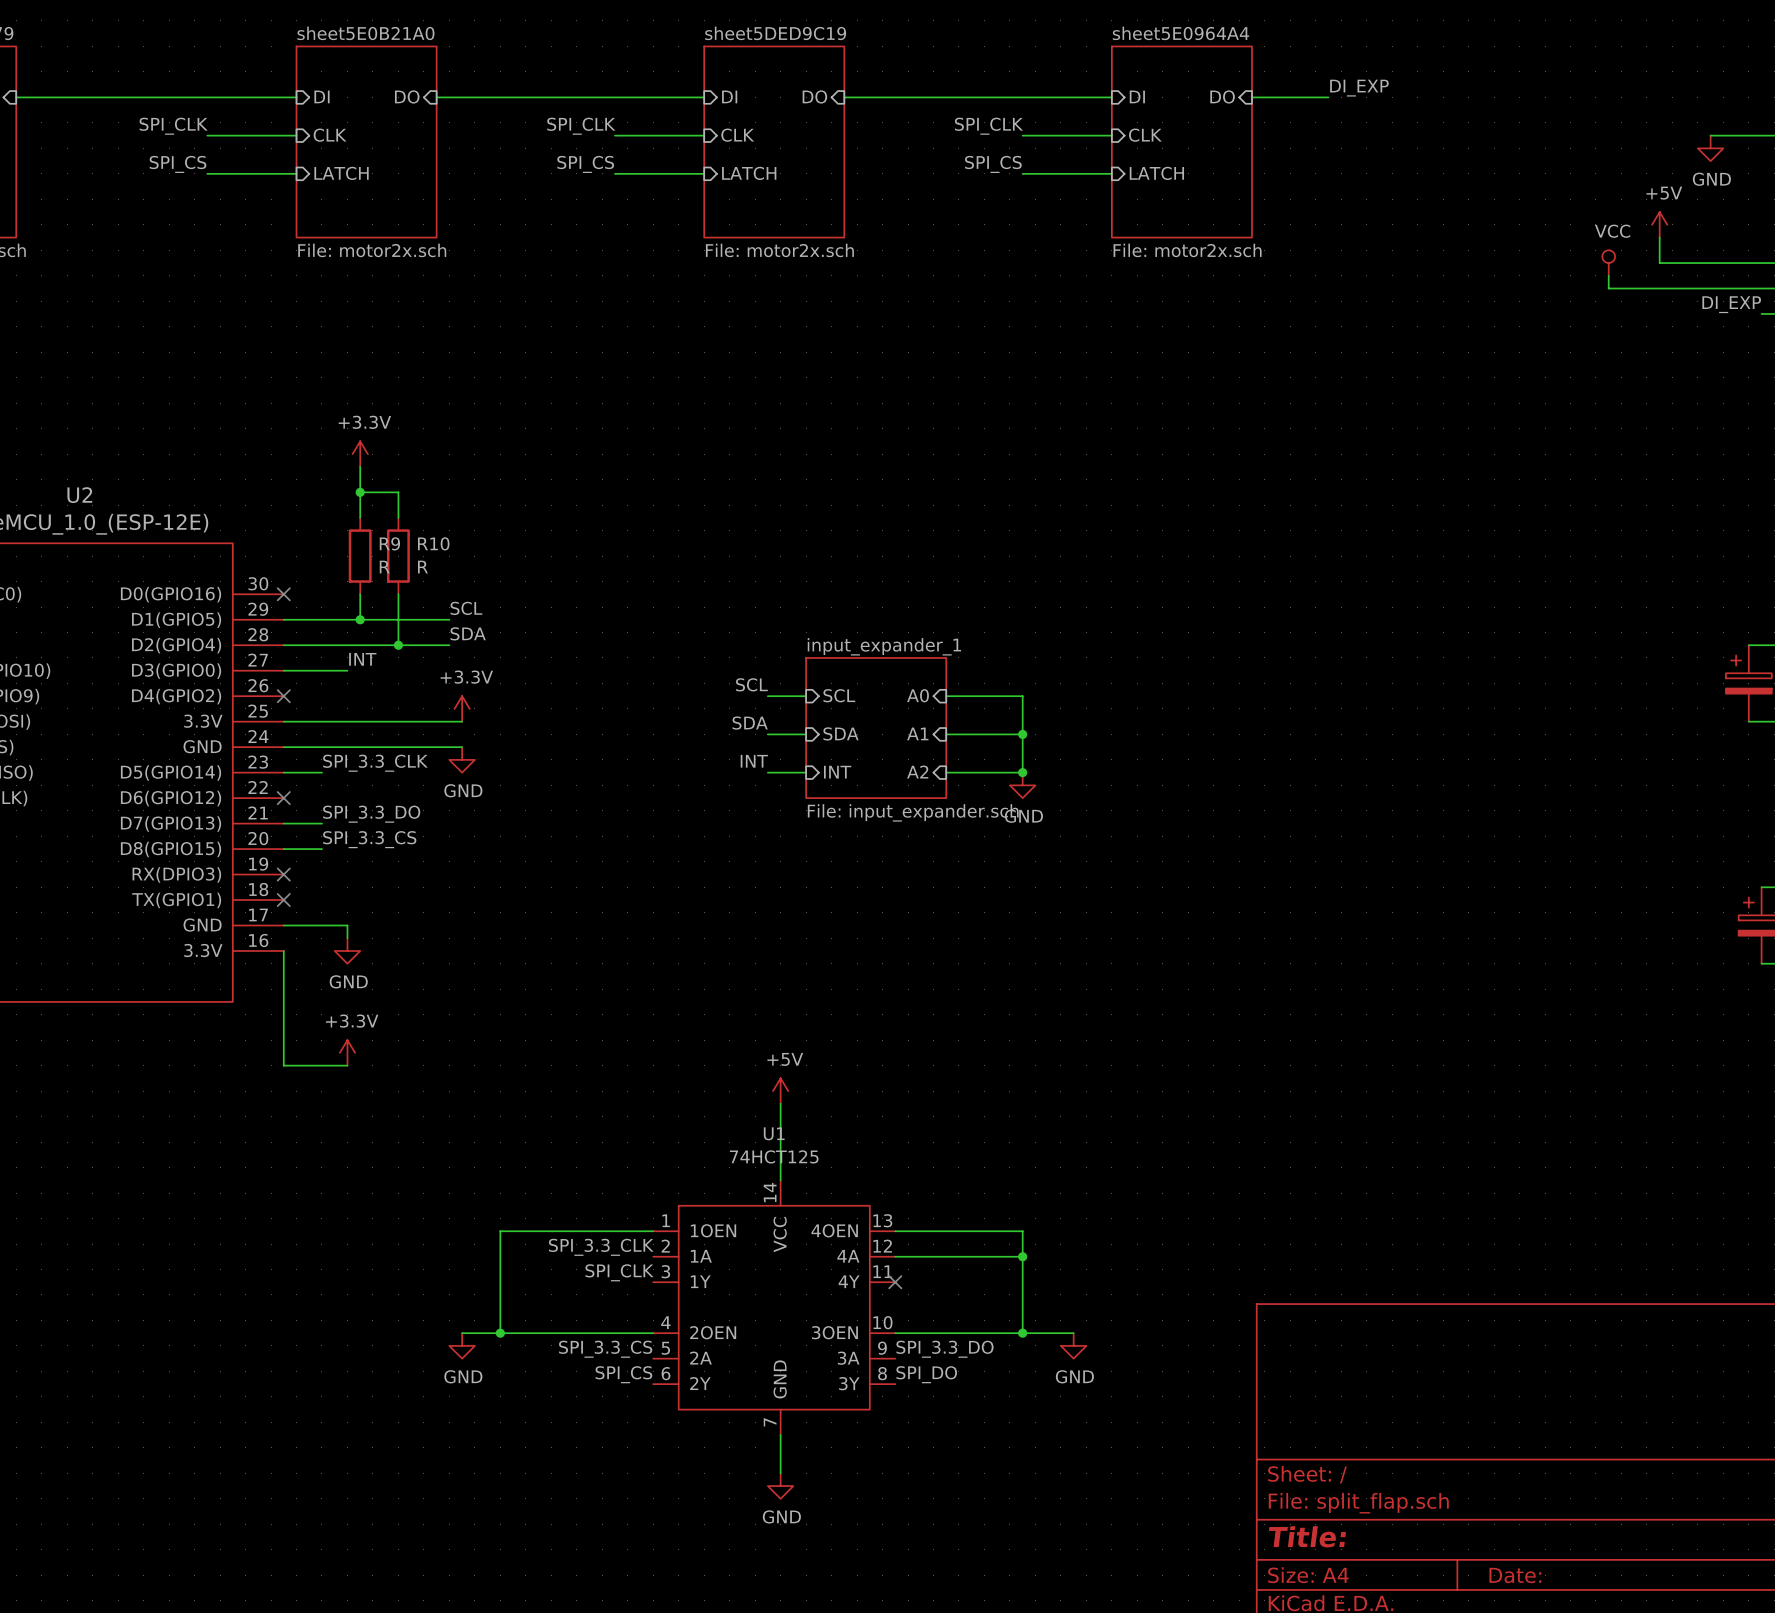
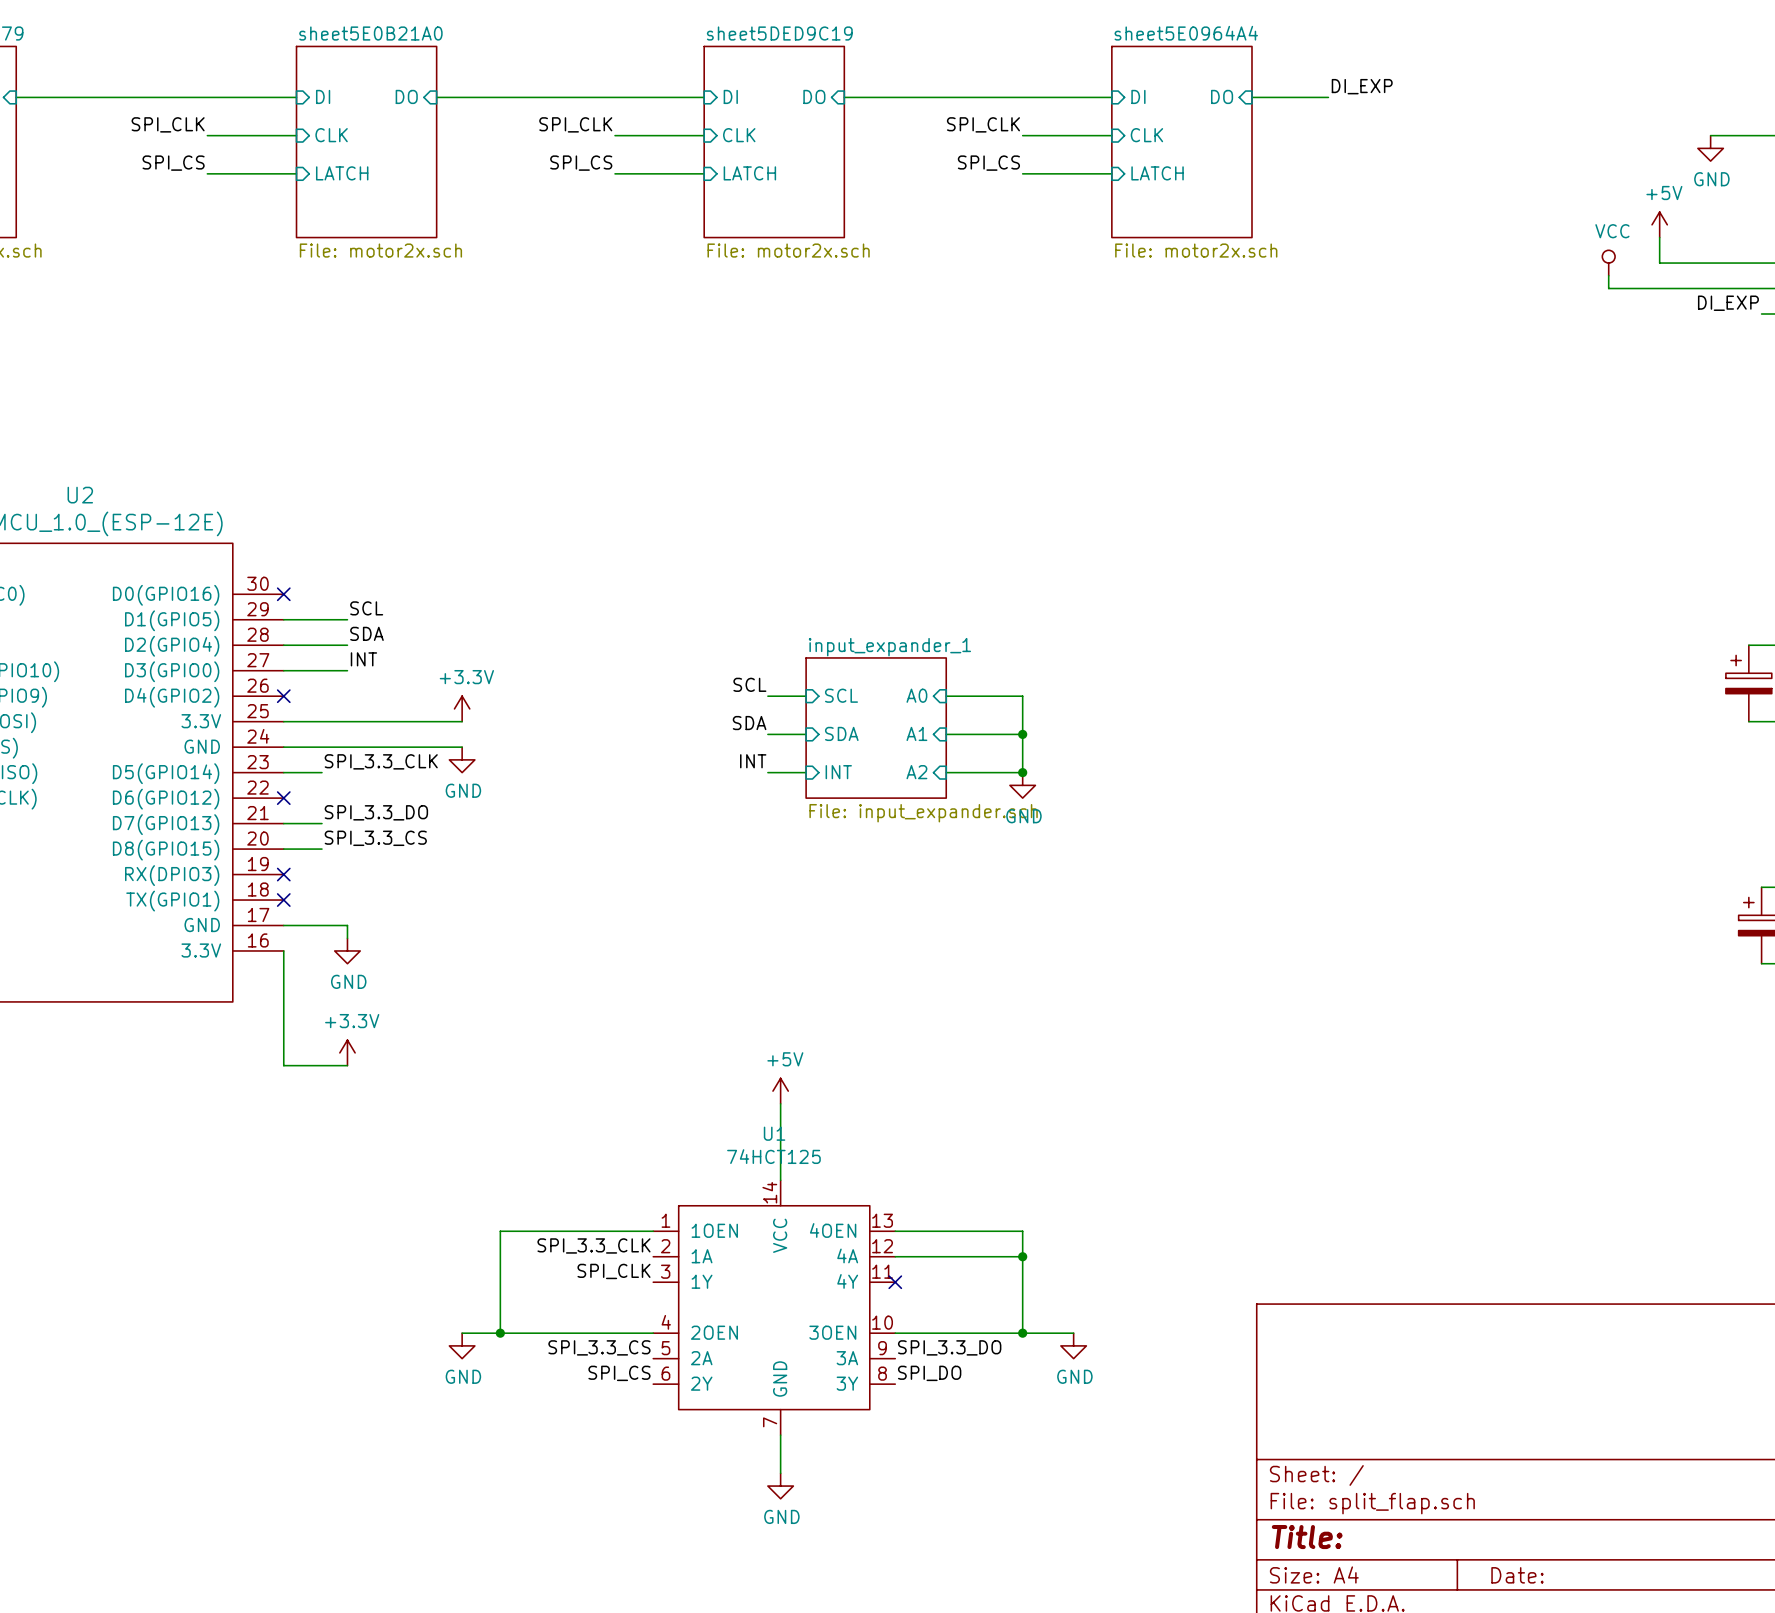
power symbol: +3.3V (360, 454) -> none
wire: (360, 466) (360, 517) -> none
wire: (360, 492) (398, 492) (398, 517) -> none
junction: (360, 492) -> none
R9: R (360, 556) -> none
R10: R (398, 556) -> none
wire: (360, 594) (360, 619) -> none
wire: (398, 594) (398, 645) -> none
label position: SCL (466, 608) -> SCL (366, 608)
wire: (347, 619) (449, 619) -> none
junction: (360, 619) -> none
label position: SDA (468, 633) -> SDA (366, 633)
wire: (347, 645) (449, 645) -> none
junction: (398, 645) -> none

